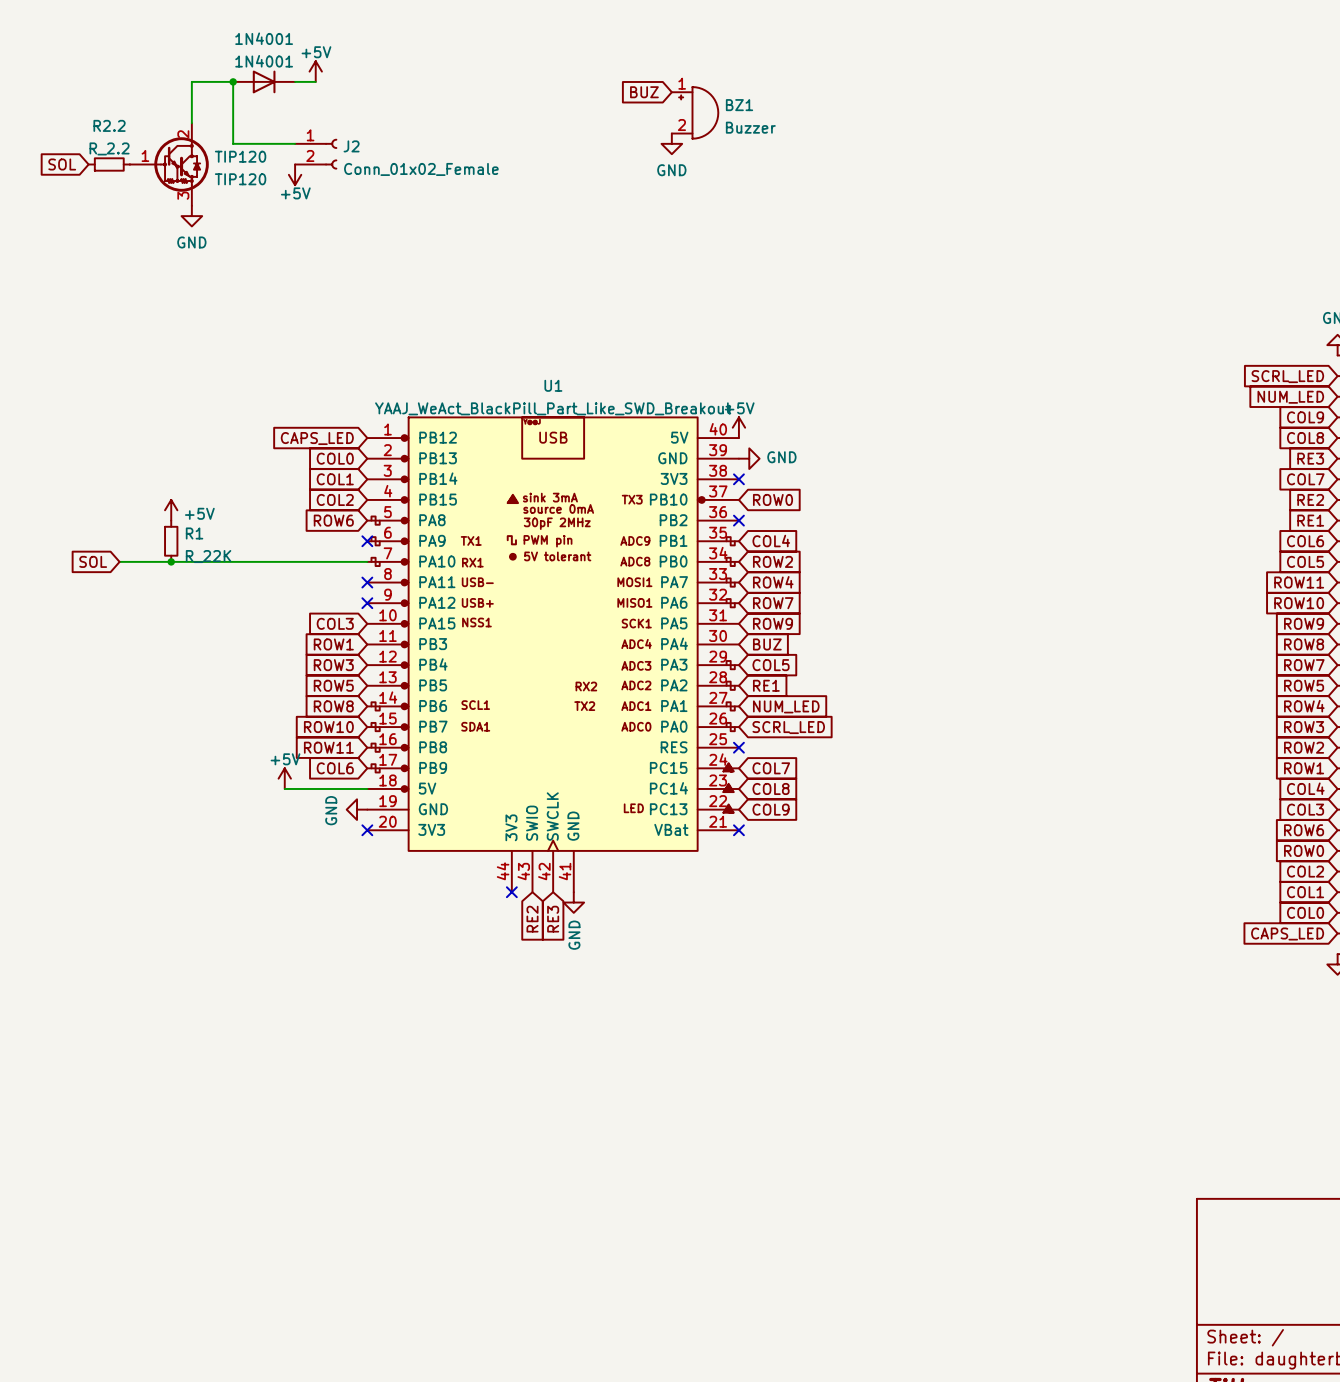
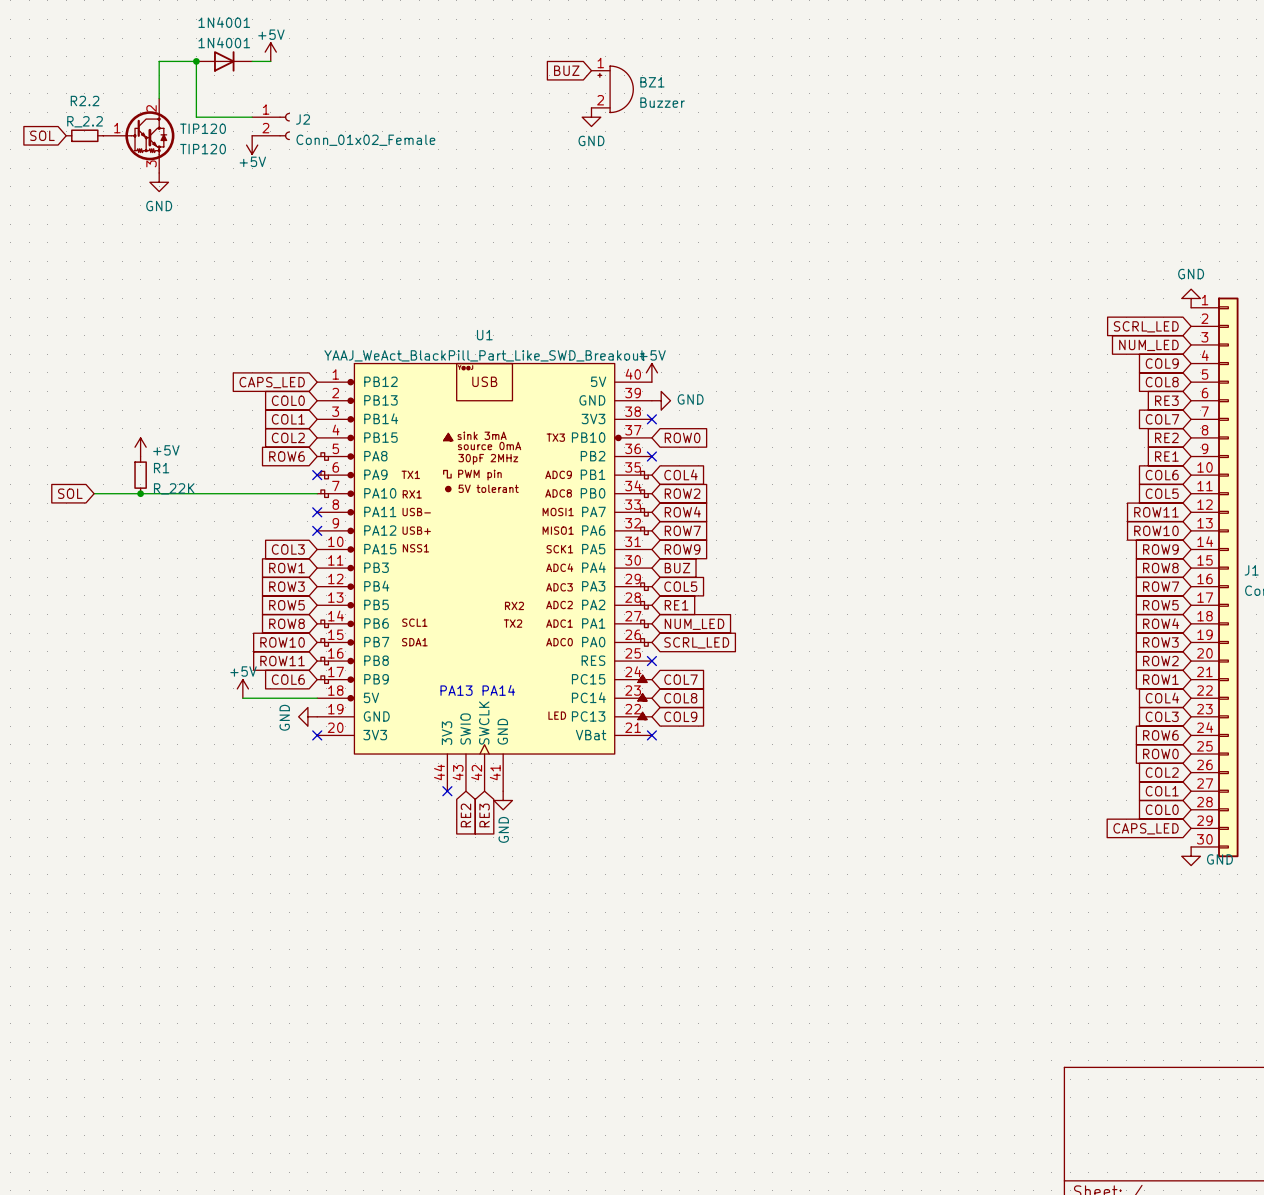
text: none -> PA13 PA14 (477, 690)

